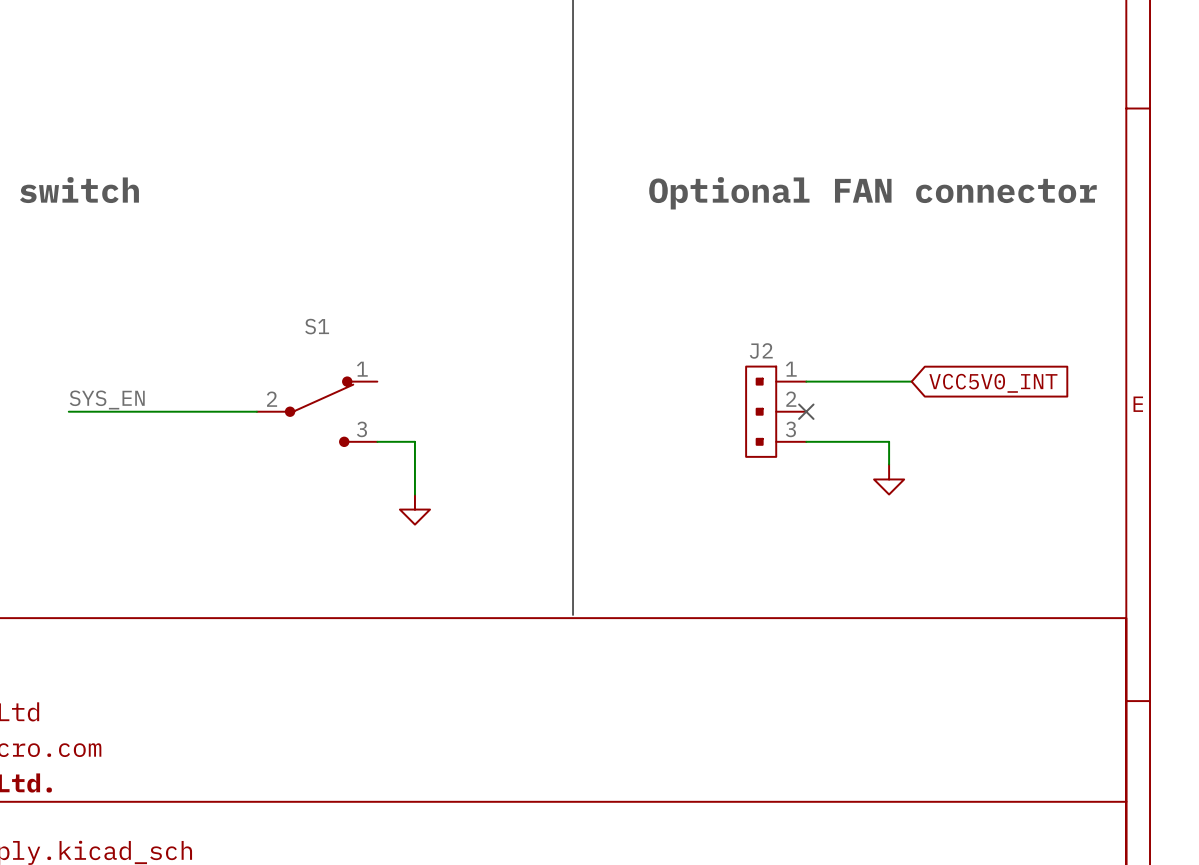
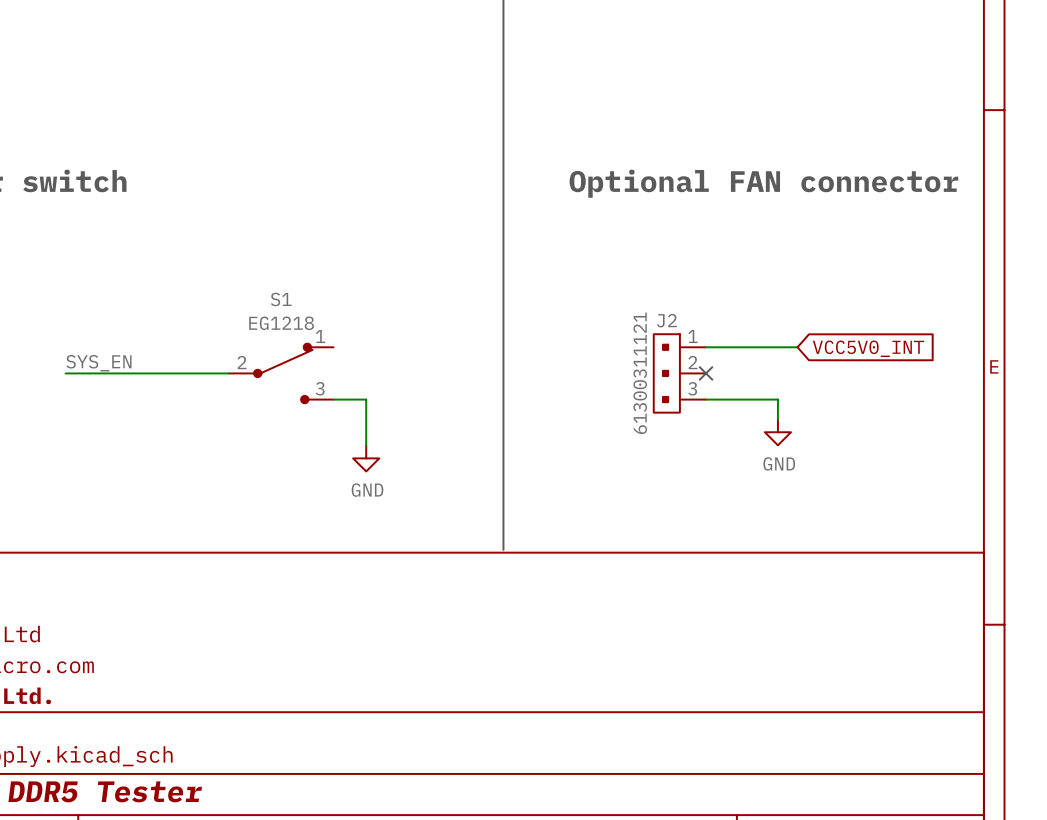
S1 value: none -> EG1218 (281, 323)
J2 value: none -> 61300311121 (640, 373)
power symbol text: none -> GND (779, 463)
power symbol text: none -> GND (367, 490)

